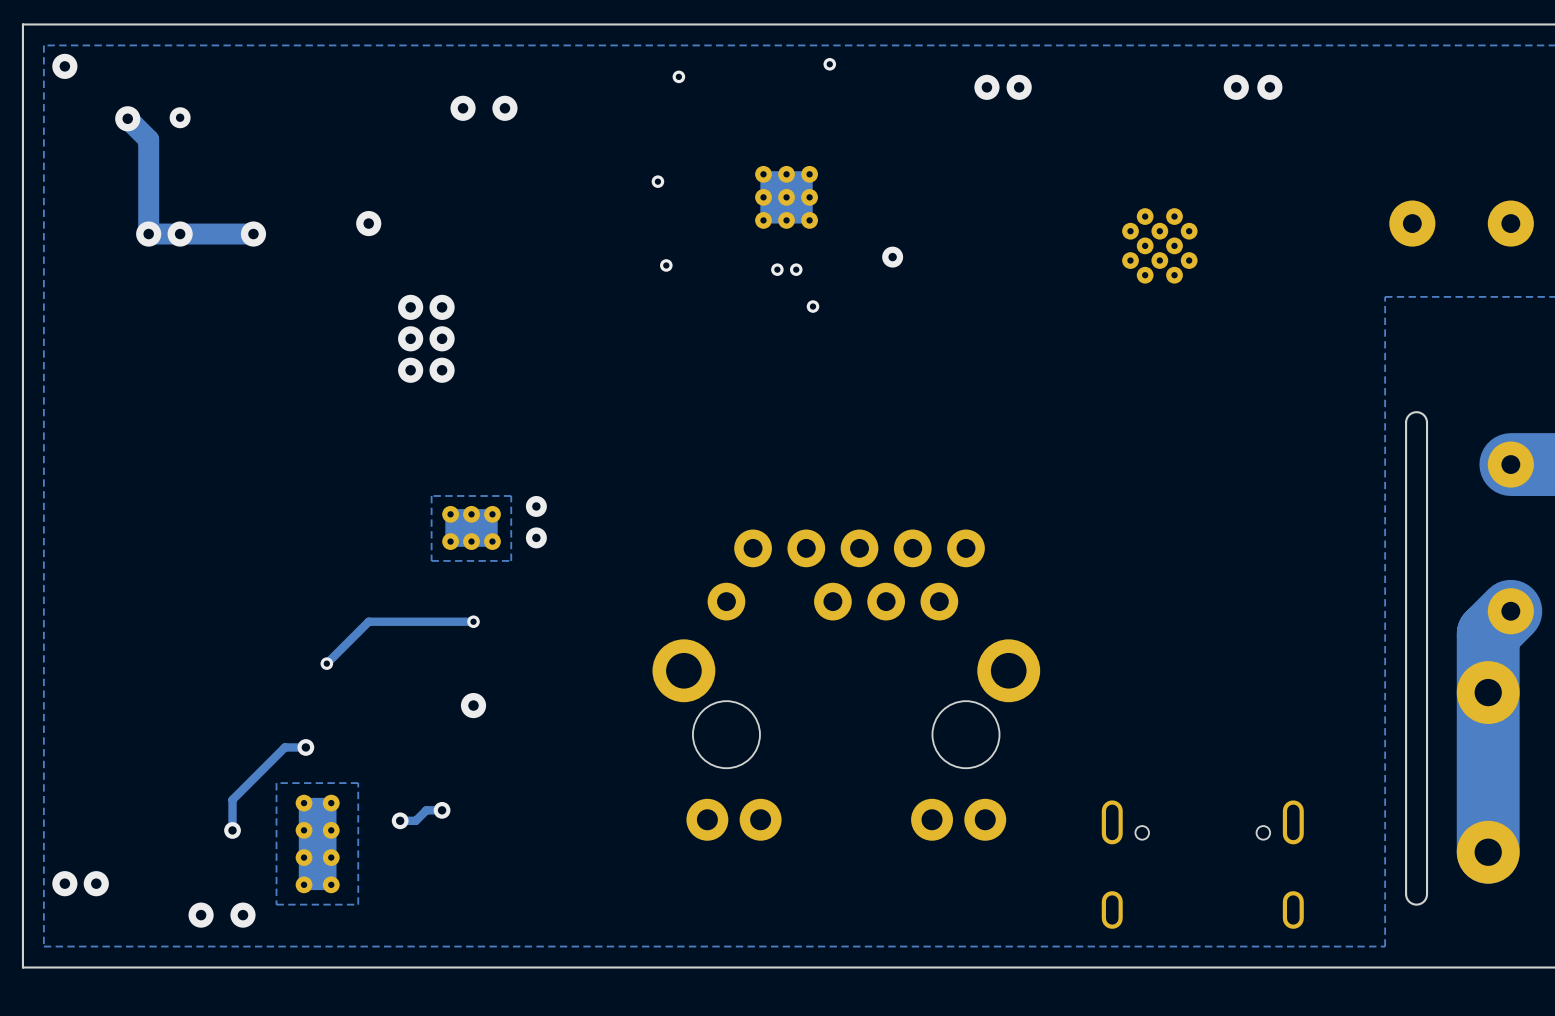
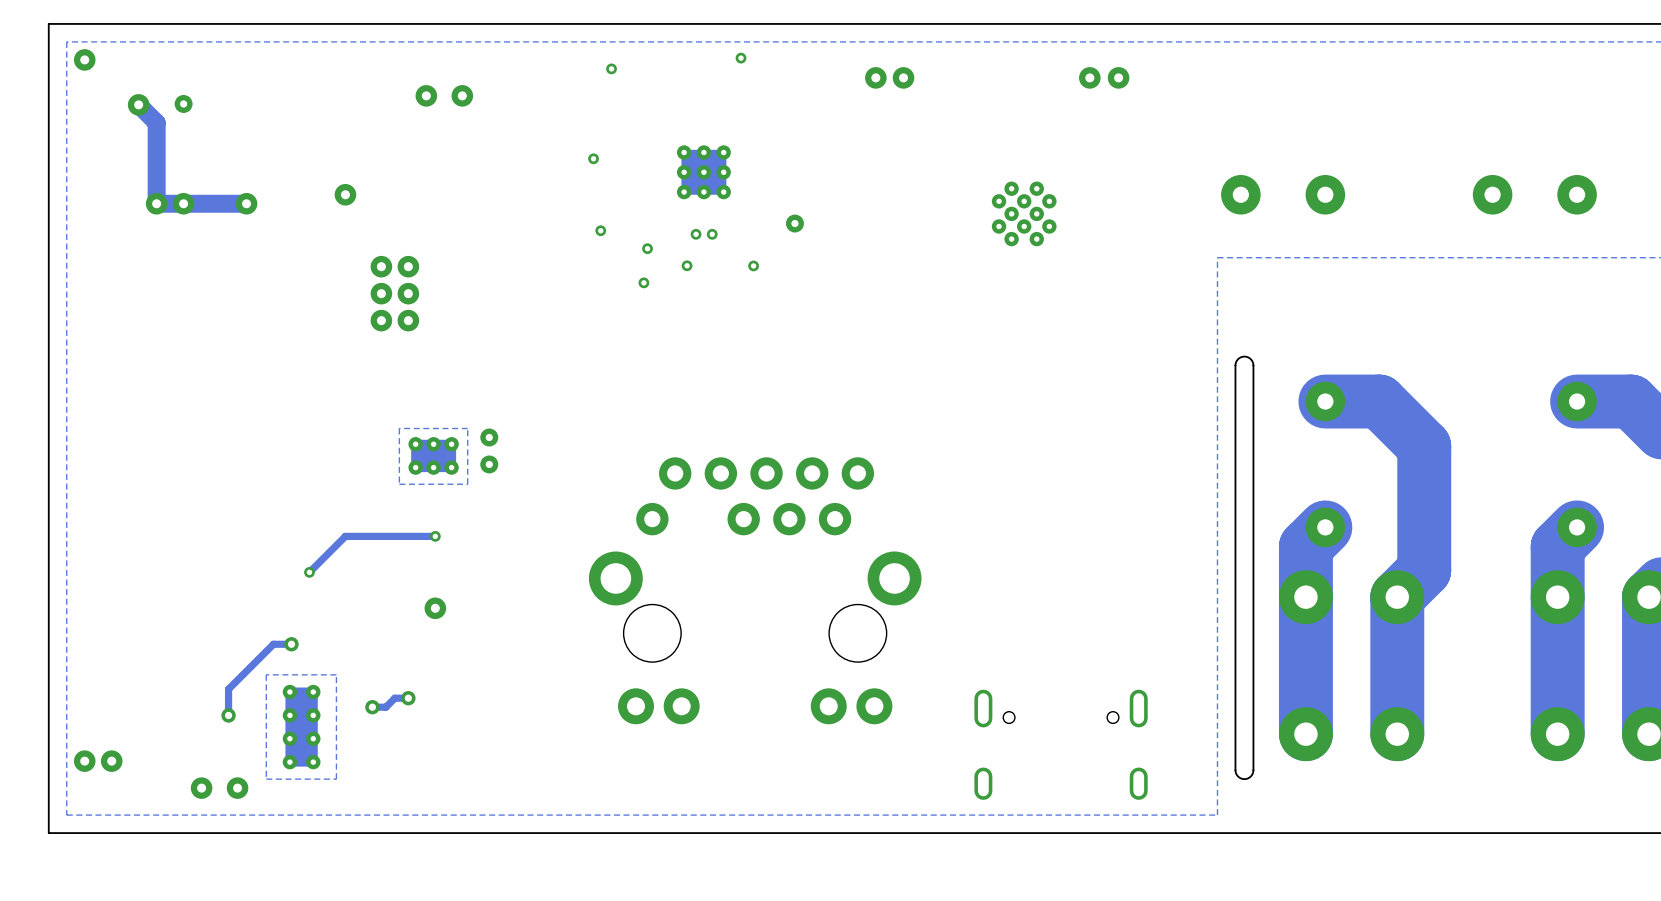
via: none -> (647, 248)
via: none -> (687, 265)
via: (813, 306) -> none
via: none -> (753, 265)
via: none -> (643, 282)

